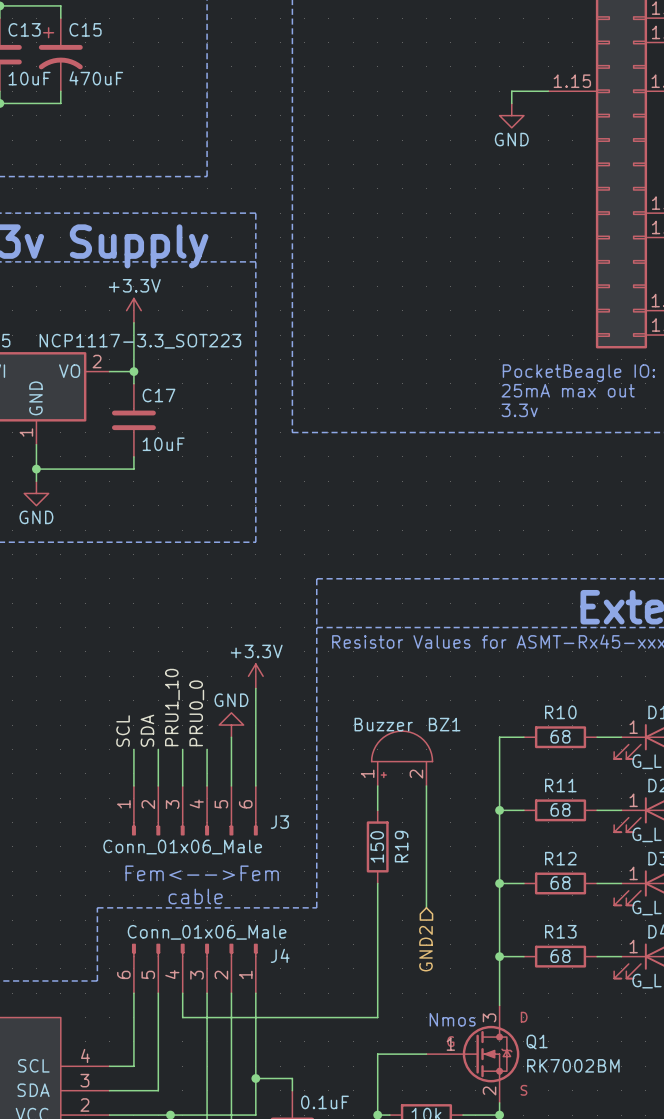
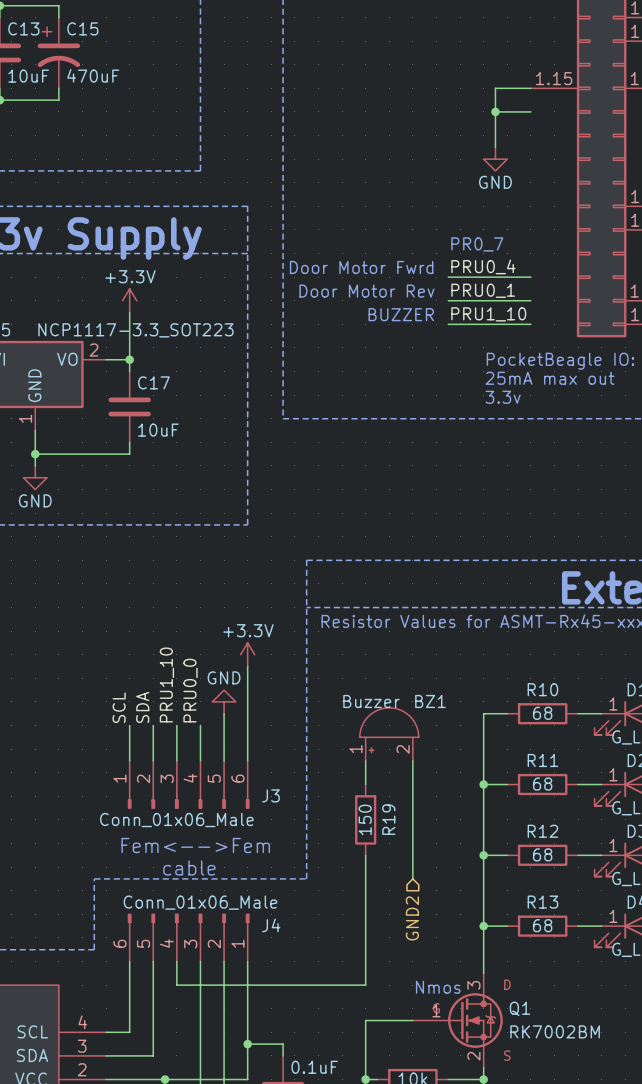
wire: none -> (495, 100) (495, 147)
wire: none -> (495, 111) (530, 111)
power symbol position: GND (511, 115) -> GND (495, 159)
junction: none -> (495, 111)
text: none -> PR0_7 (477, 244)
label: none -> PRU0_4 (483, 266)
text: none -> Door Motor Fwrd (361, 267)
wire: none -> (448, 277) (530, 277)
text: none -> Door Motor Rev (366, 291)
label: none -> PRU0_1 (483, 290)
wire: none -> (448, 300) (530, 300)
label: none -> PRU1_10 (488, 314)
text: none -> BUZZER (401, 314)
wire: none -> (448, 324) (530, 324)

